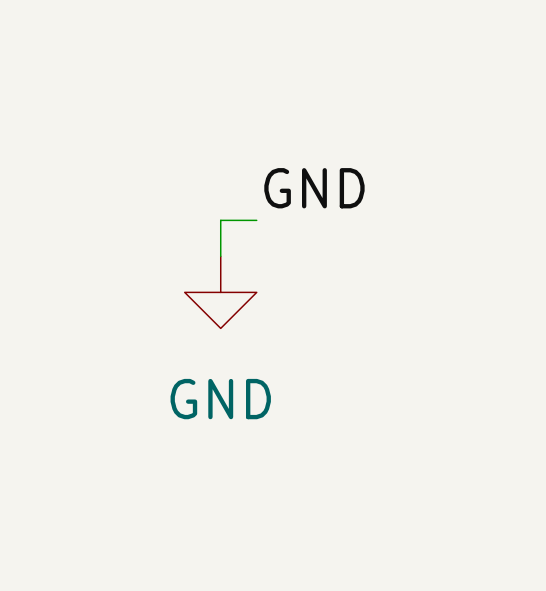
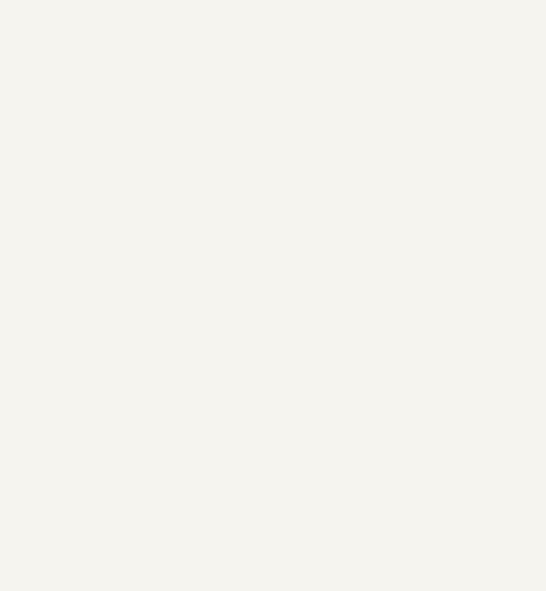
label: GND (314, 188) -> none
wire: (256, 220) (220, 220) (220, 256) -> none
power symbol: GND (220, 292) -> none

